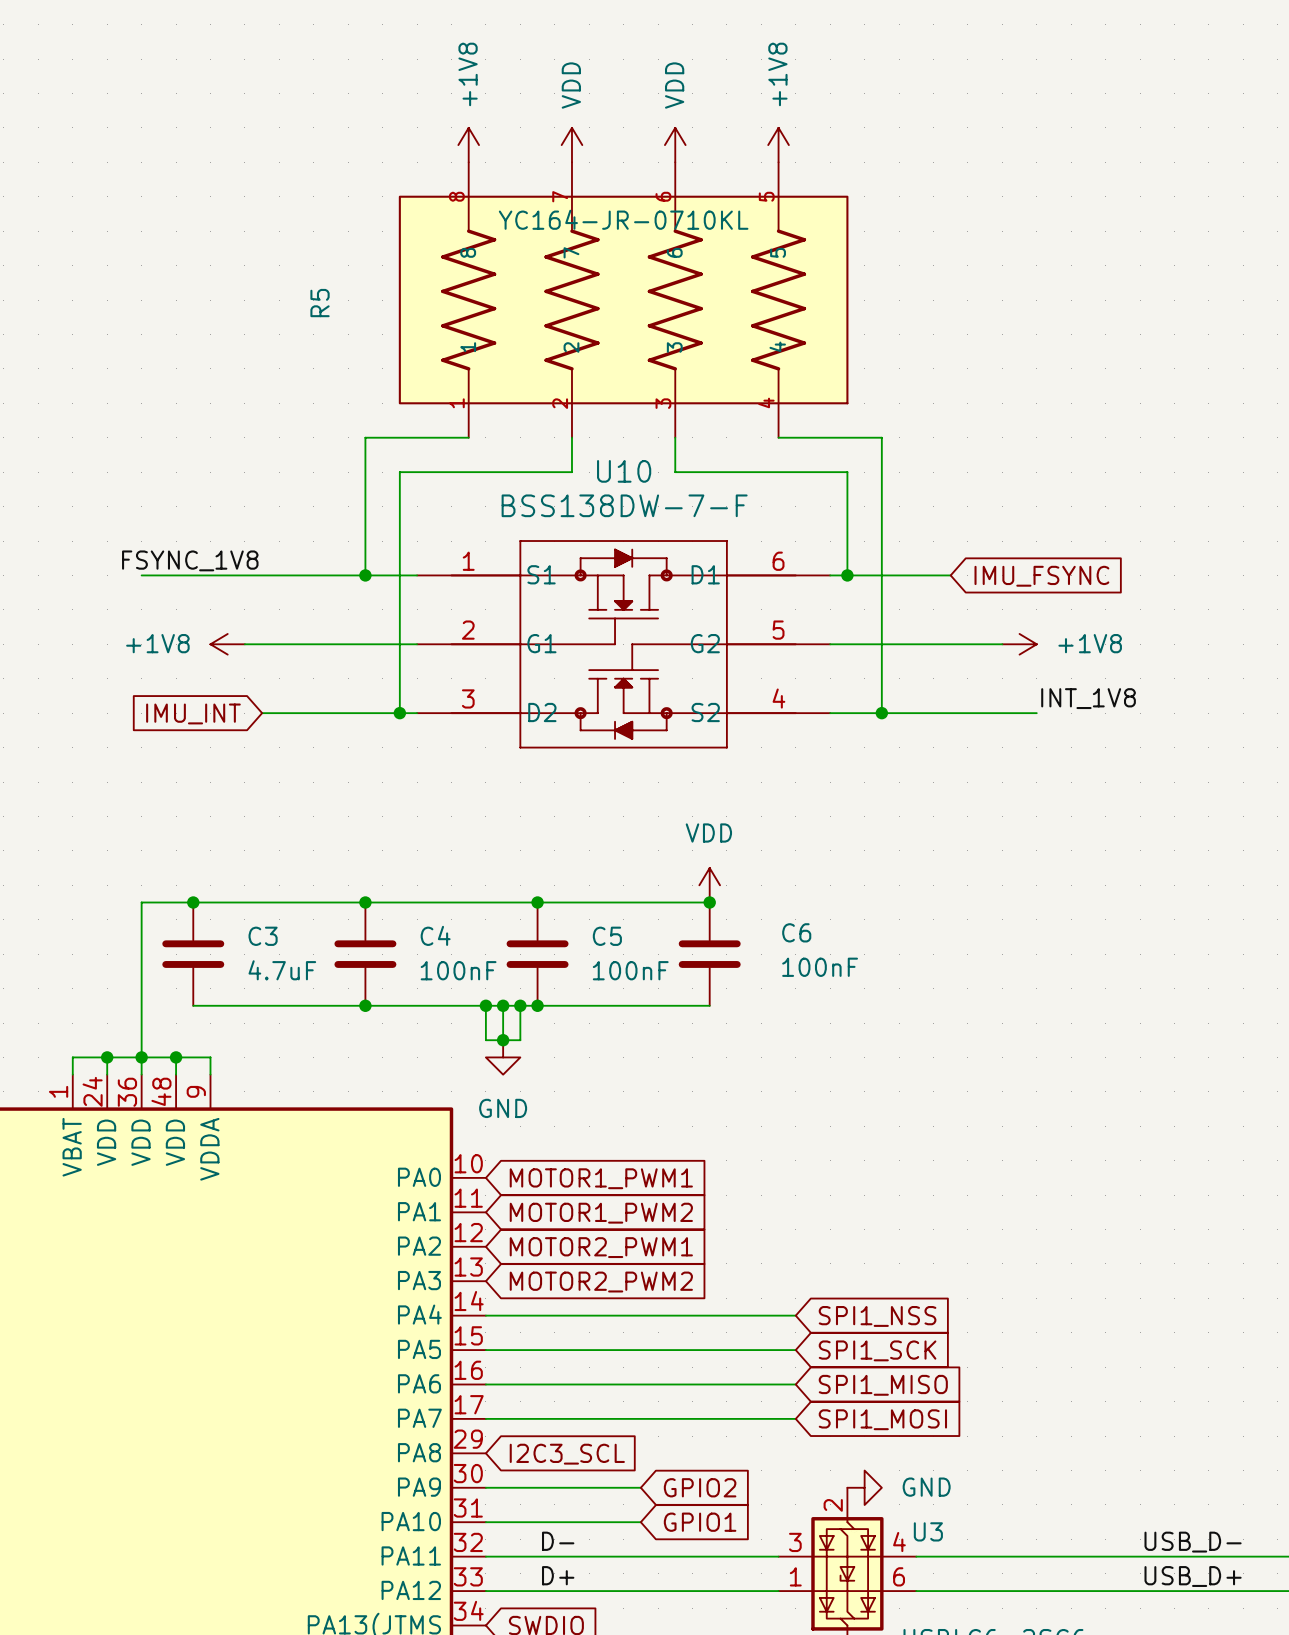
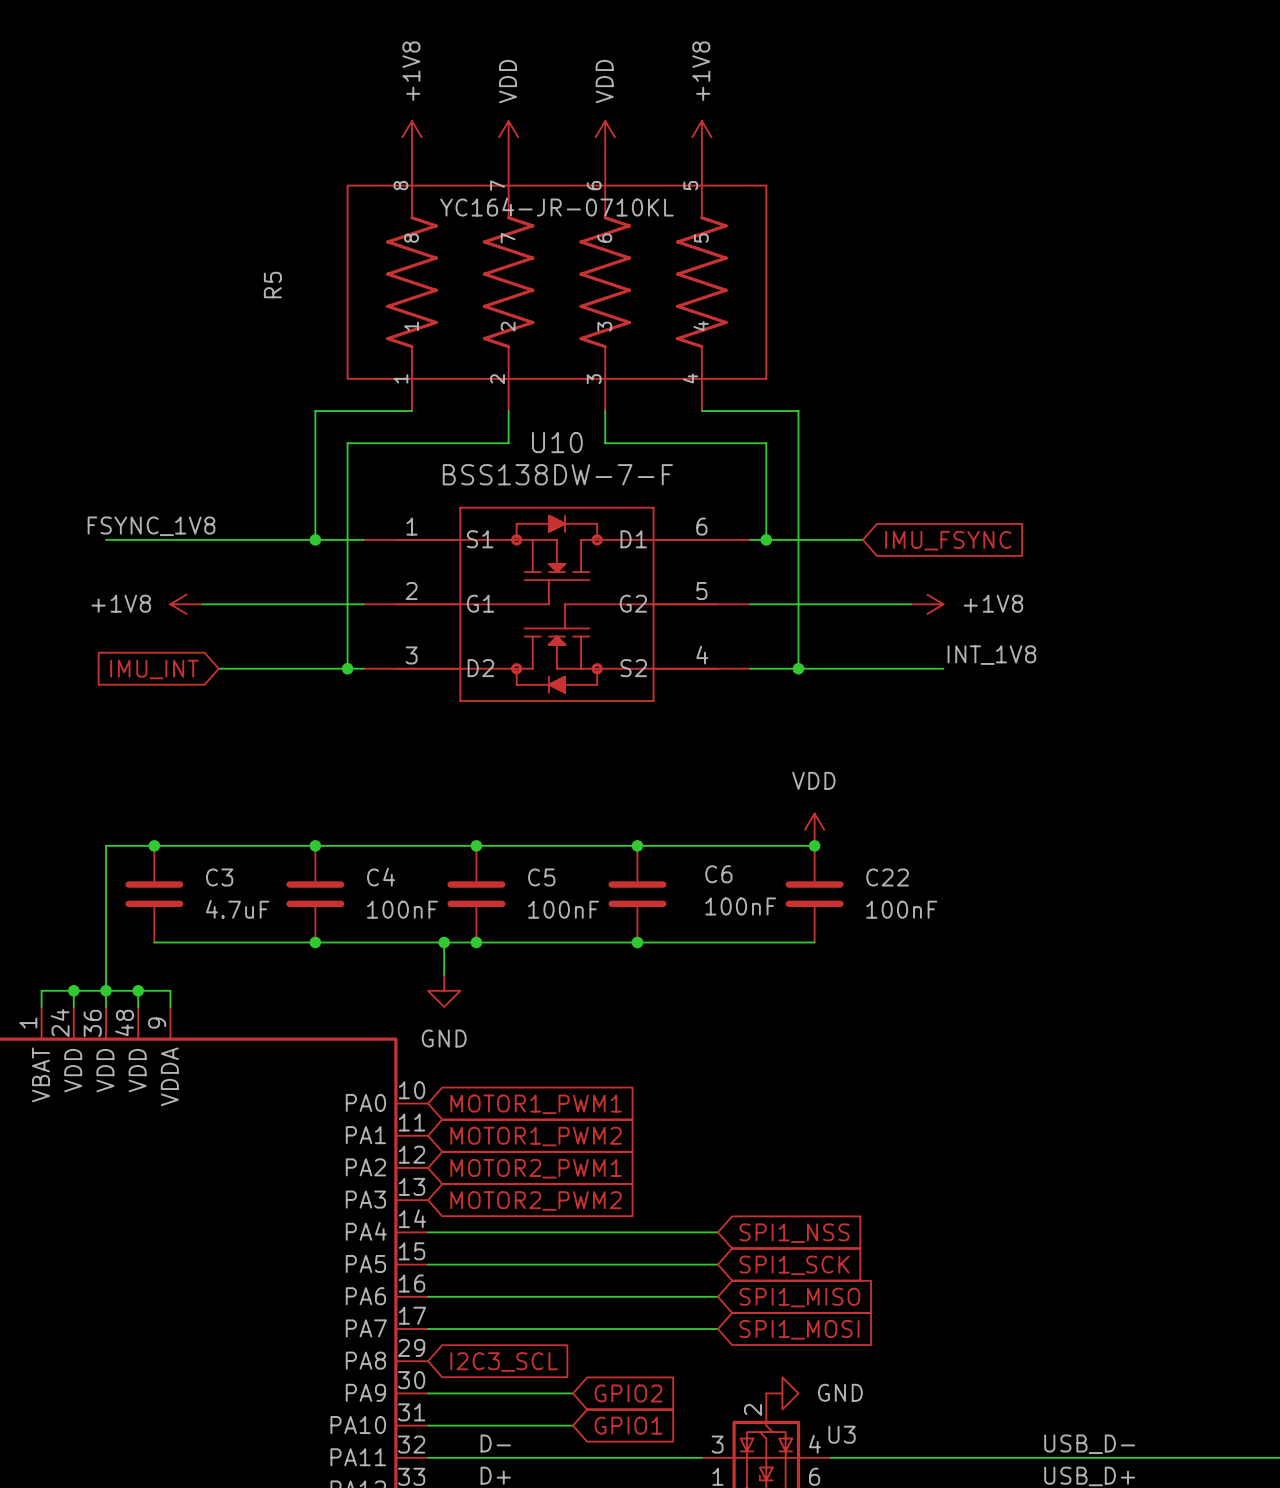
power symbol position: VDD (709, 885) -> VDD (814, 829)
wire: none -> (637, 845) (814, 845)
junction: none -> (814, 845)
C22: none -> 100nF (814, 894)
wire: (485, 1005) (485, 1040) (520, 1040) (520, 1005) -> none
junction: (485, 1005) -> none
junction: (520, 1005) -> none
wire: none -> (637, 942) (814, 942)
junction: none -> (637, 942)
junction: (503, 1040) -> none

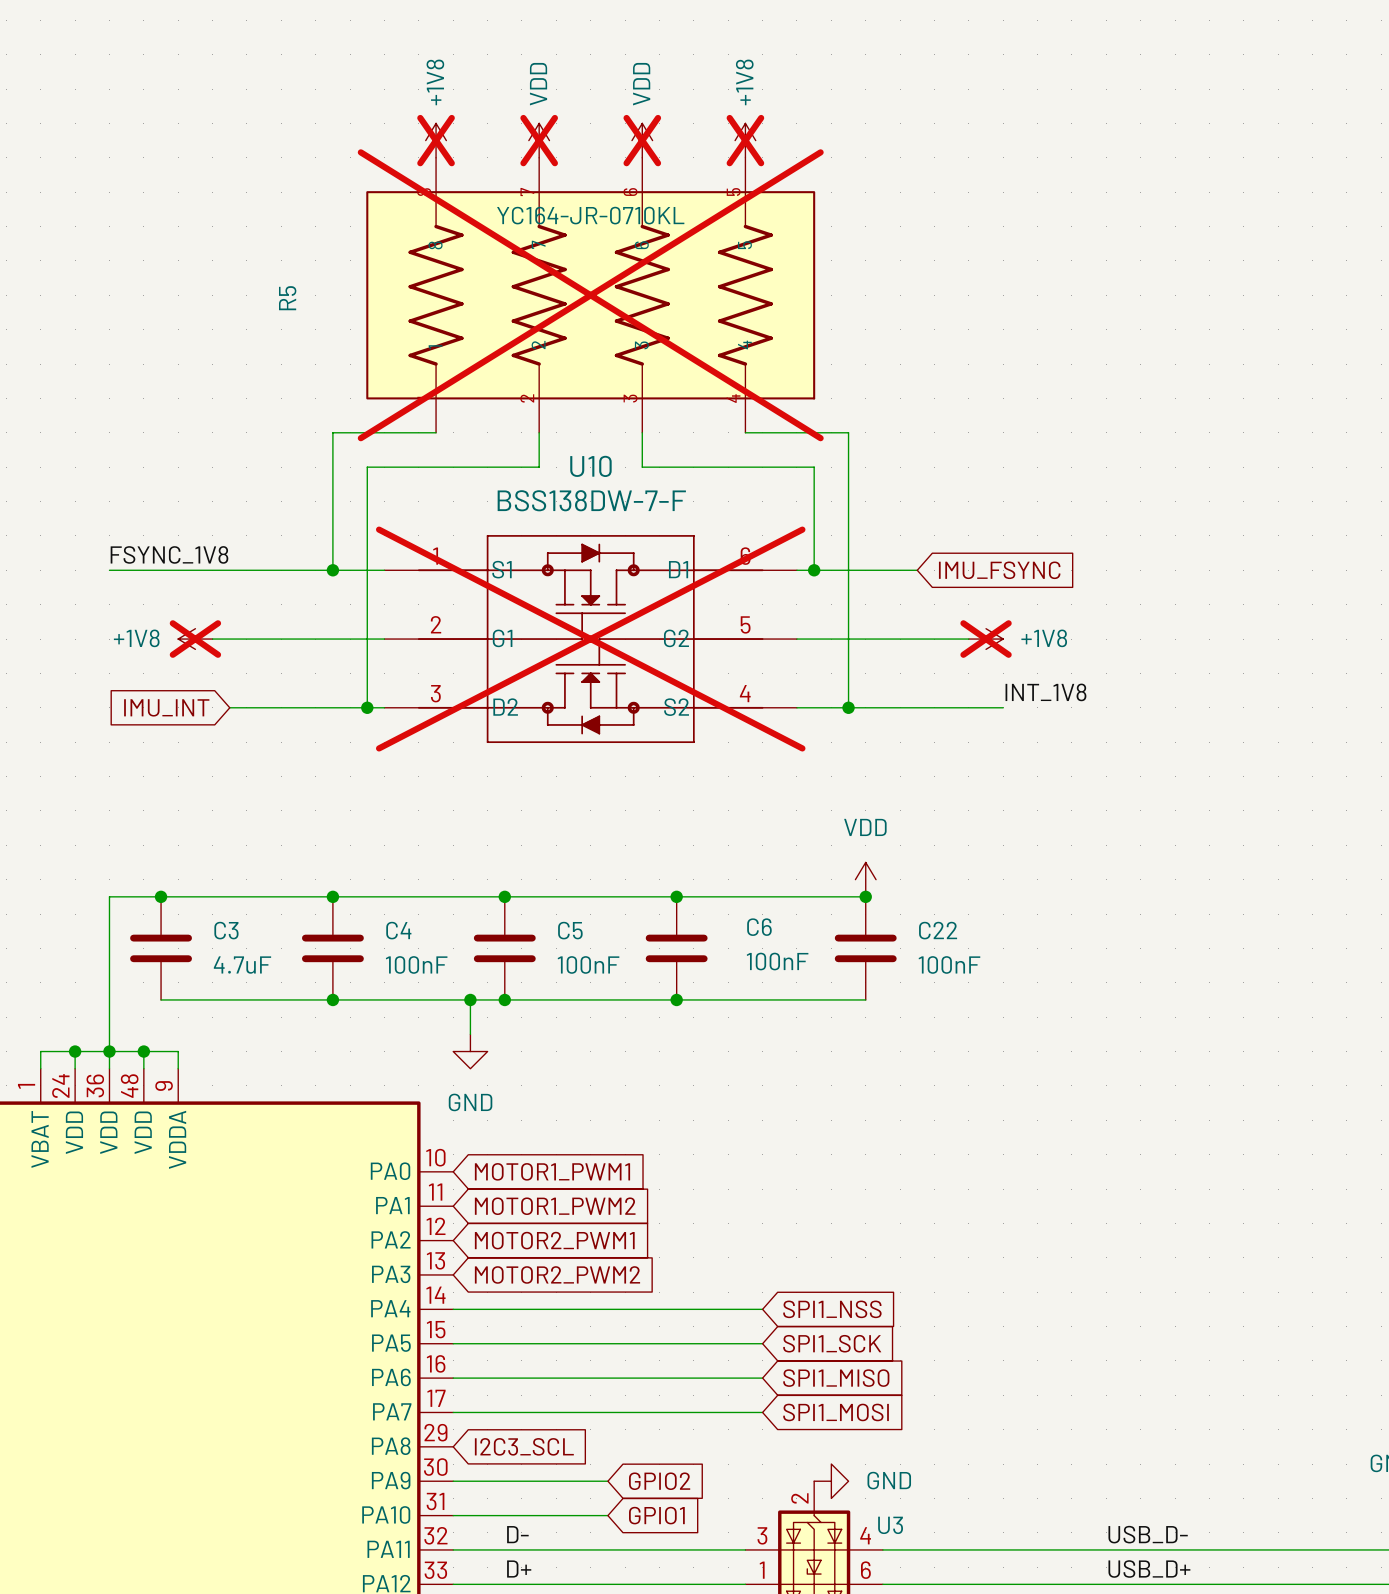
power symbol do-not-place cross: none -> (436, 140)
power symbol do-not-place cross: none -> (539, 140)
power symbol do-not-place cross: none -> (642, 140)
power symbol do-not-place cross: none -> (745, 140)
R5 do-not-place cross: none -> (590, 295)
power symbol do-not-place cross: none -> (195, 639)
U10 do-not-place cross: none -> (590, 639)
power symbol do-not-place cross: none -> (986, 639)

